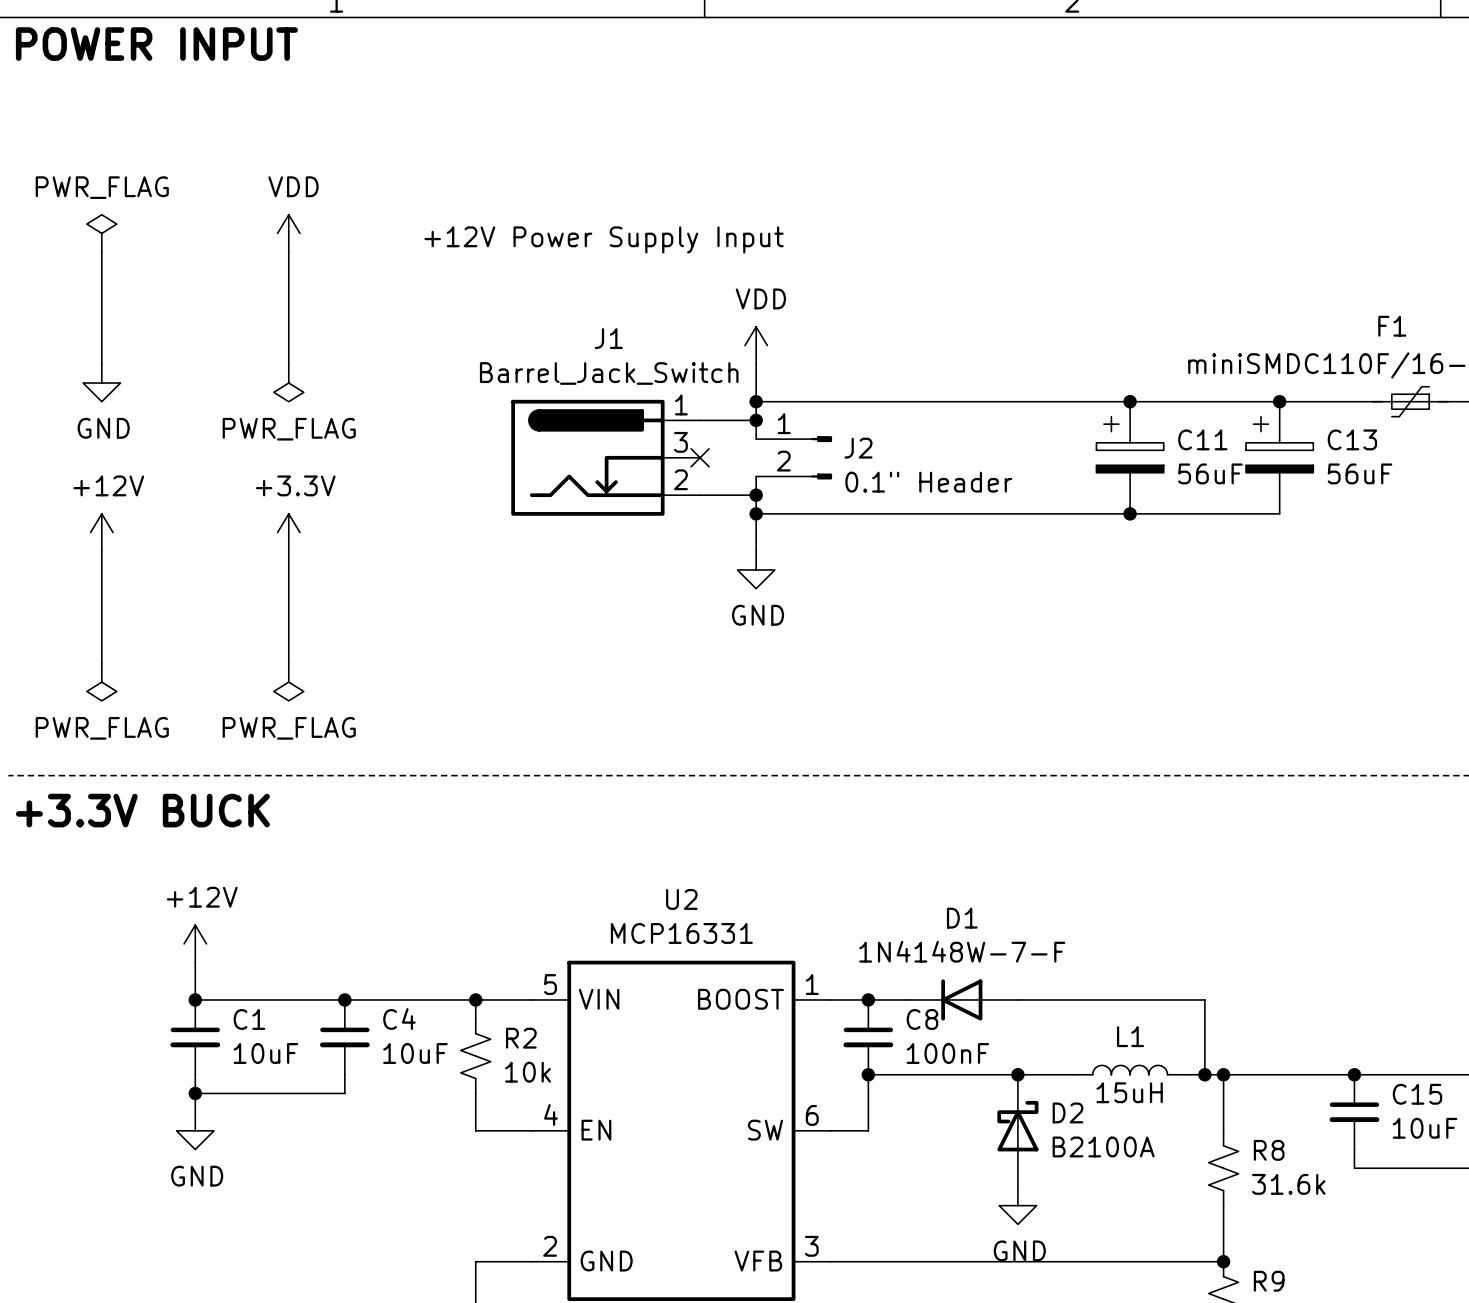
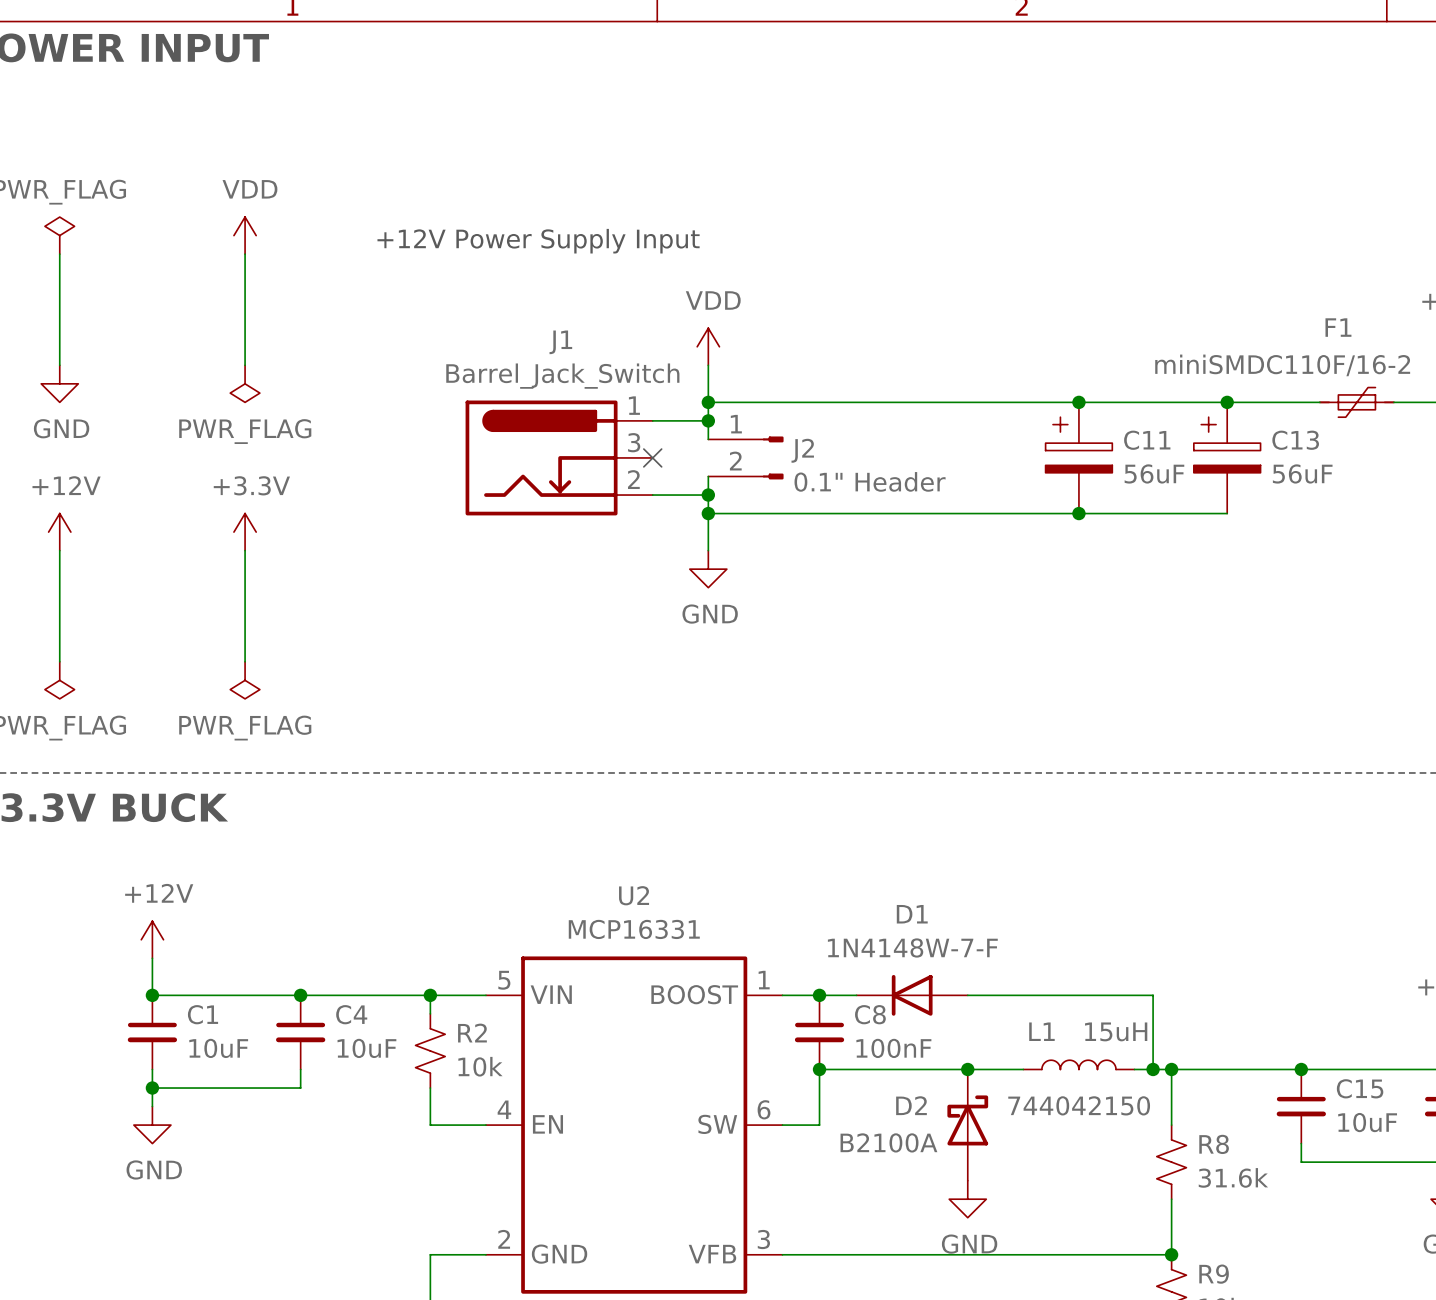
L1 name position: L1 (1130, 1036) -> L1 (1041, 1031)
L1 value position: 15uH (1129, 1092) -> 15uH (1116, 1031)
L1 text: none -> 744042150 (1079, 1105)
D2 name position: D2 (1068, 1112) -> D2 (911, 1105)
D2 value position: B2100A (1103, 1146) -> B2100A (888, 1142)

